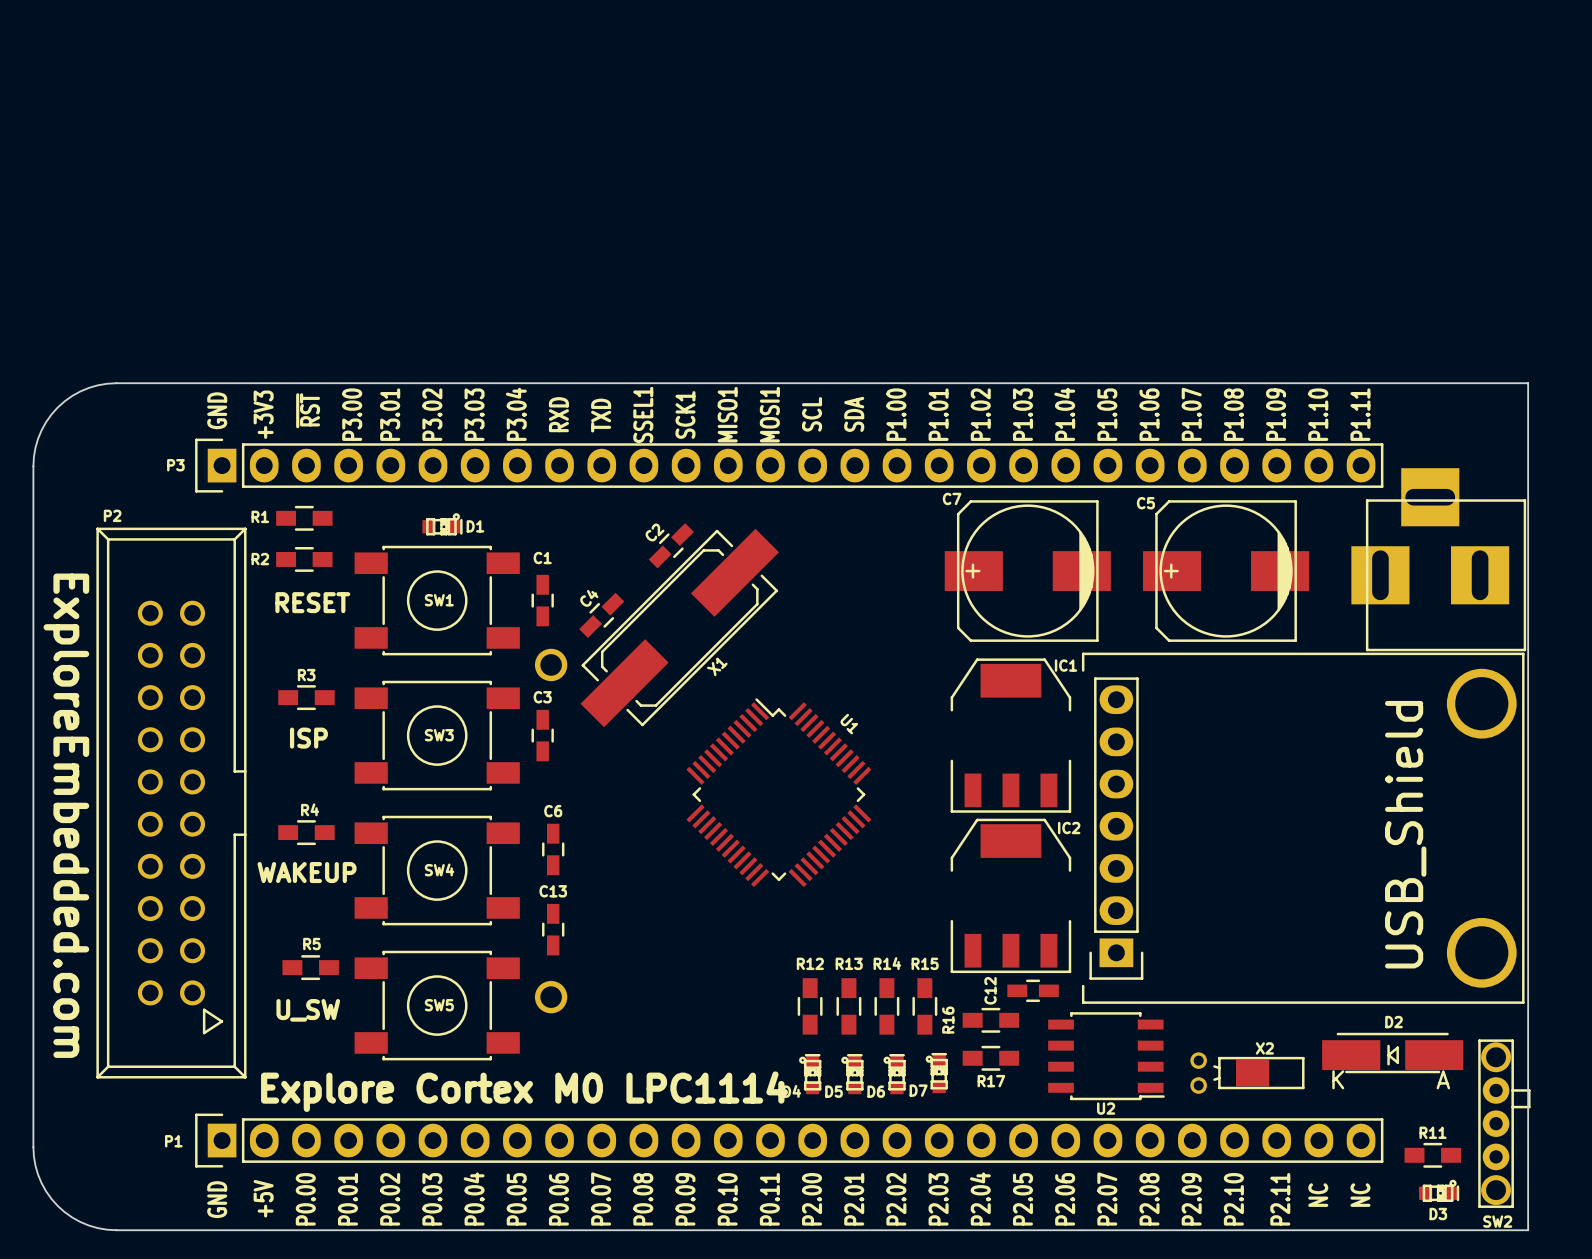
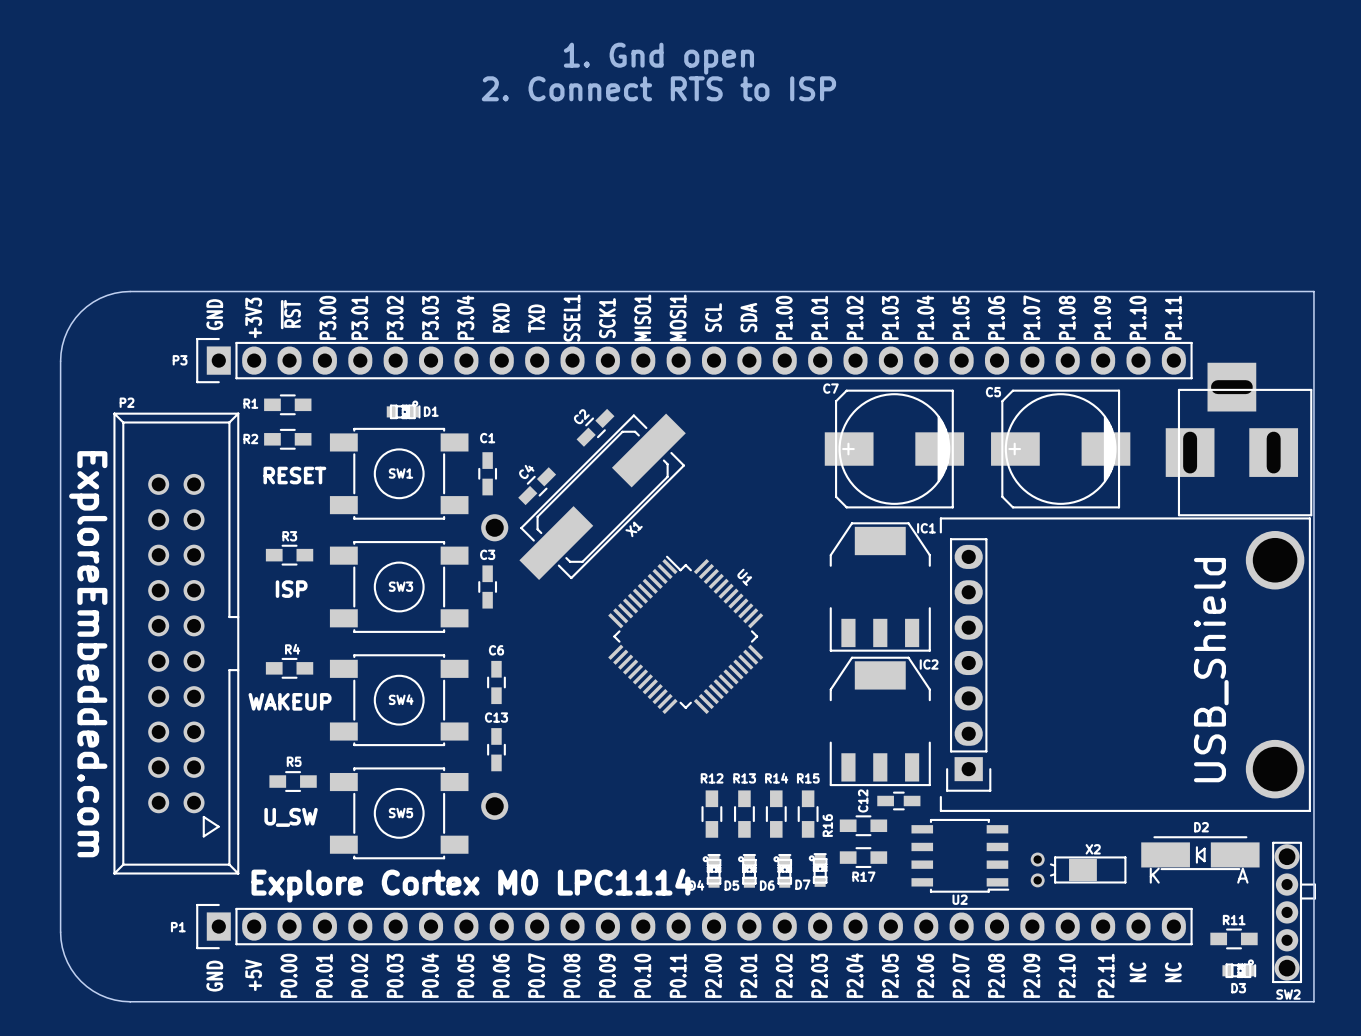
text: none -> 1. Gnd open (658, 58)
text: none -> 2. Connect RTS to ISP (658, 88)

